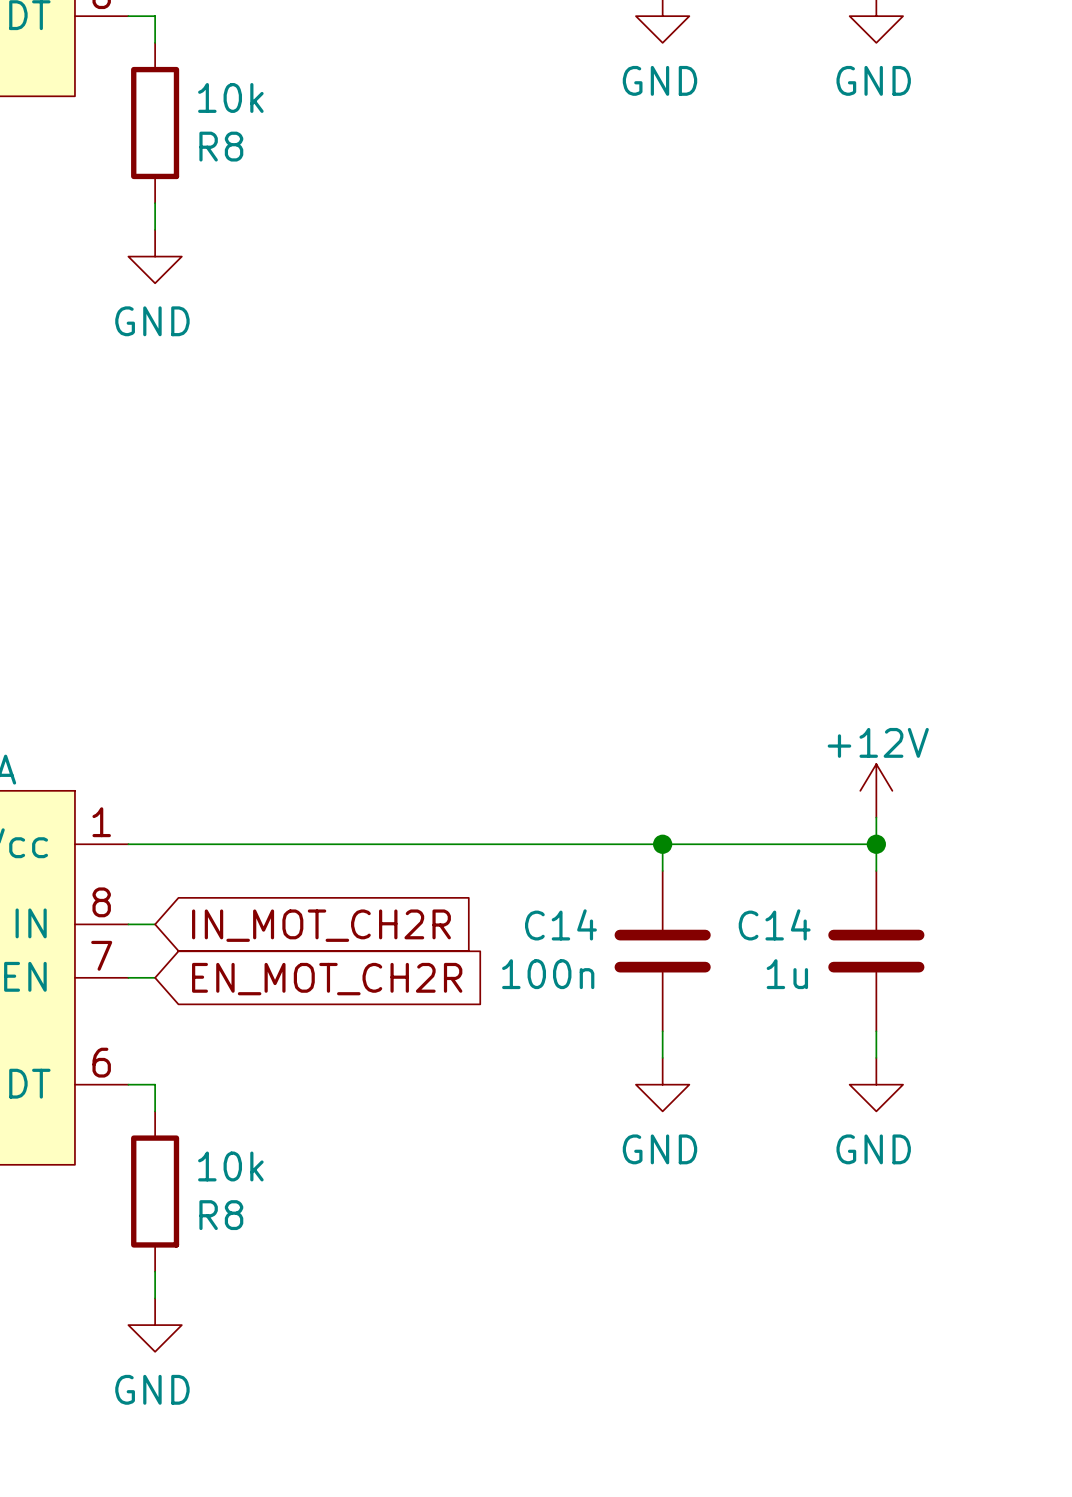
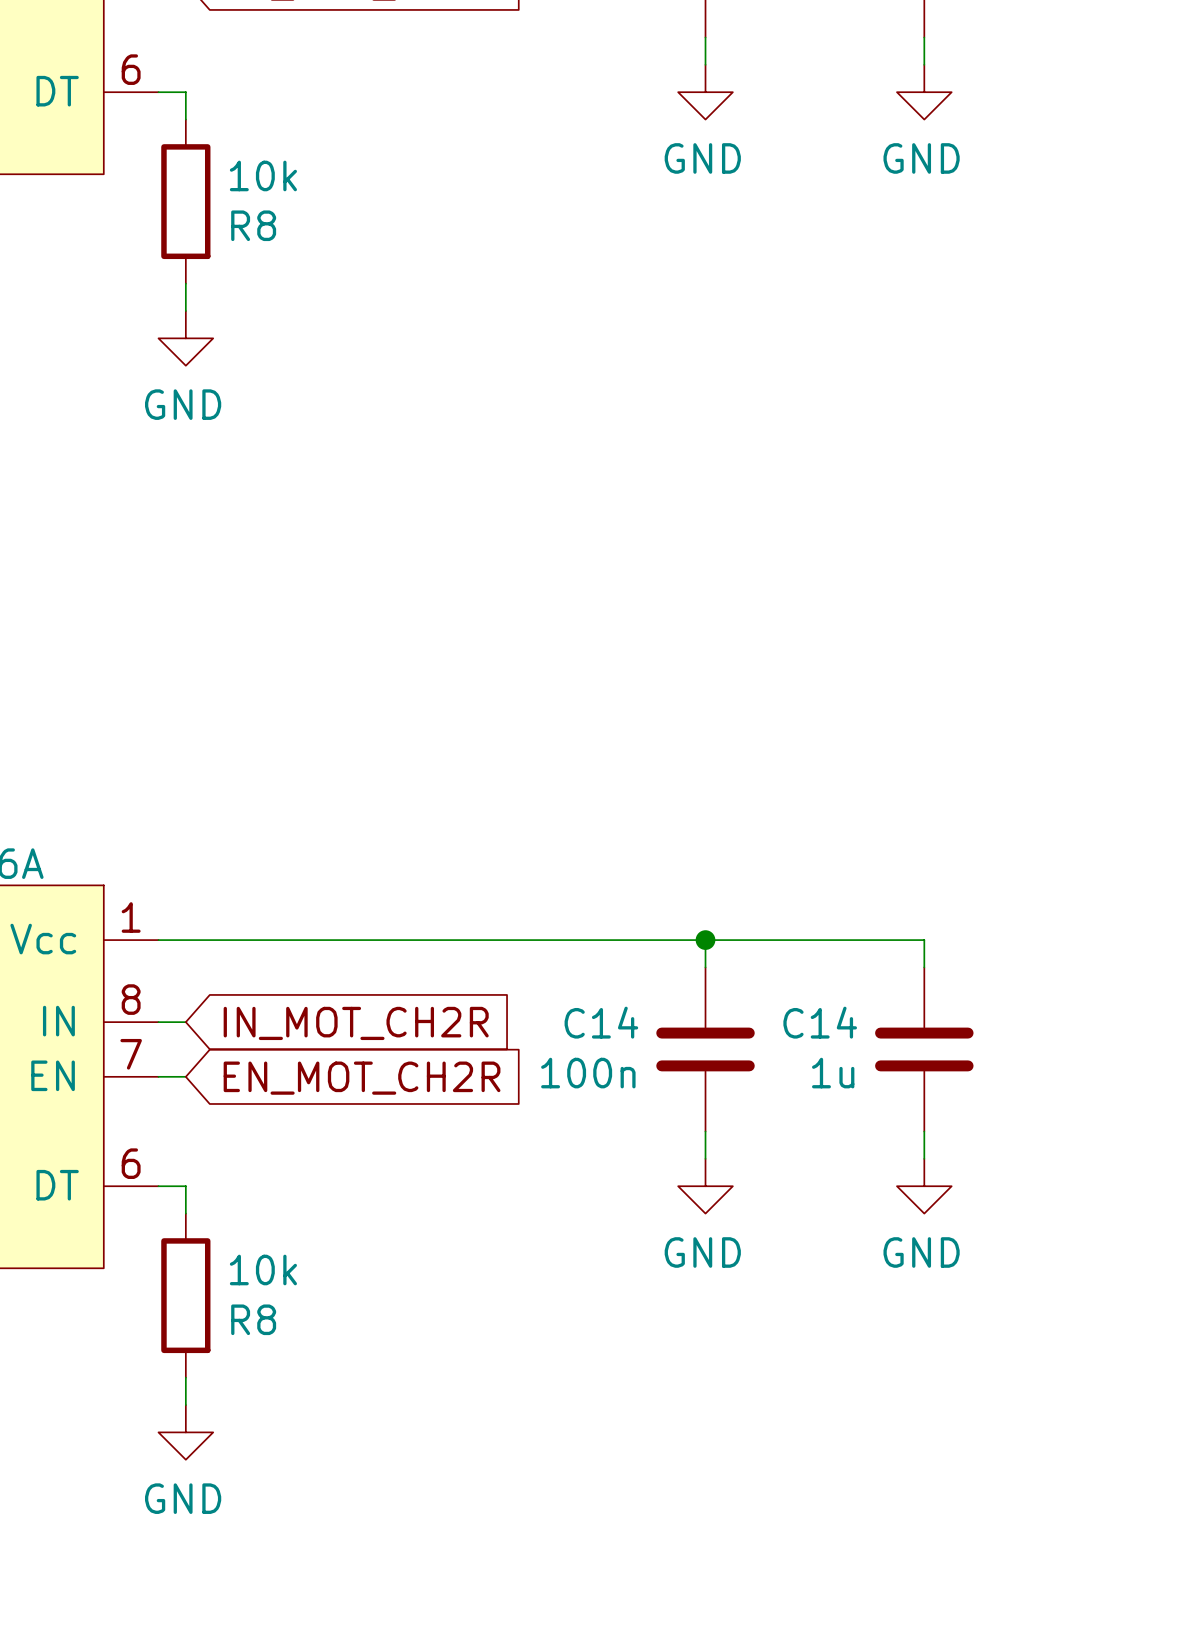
power symbol: +12V (876, 790) -> none
wire: (876, 817) (876, 844) -> none
junction: (876, 844) -> none

